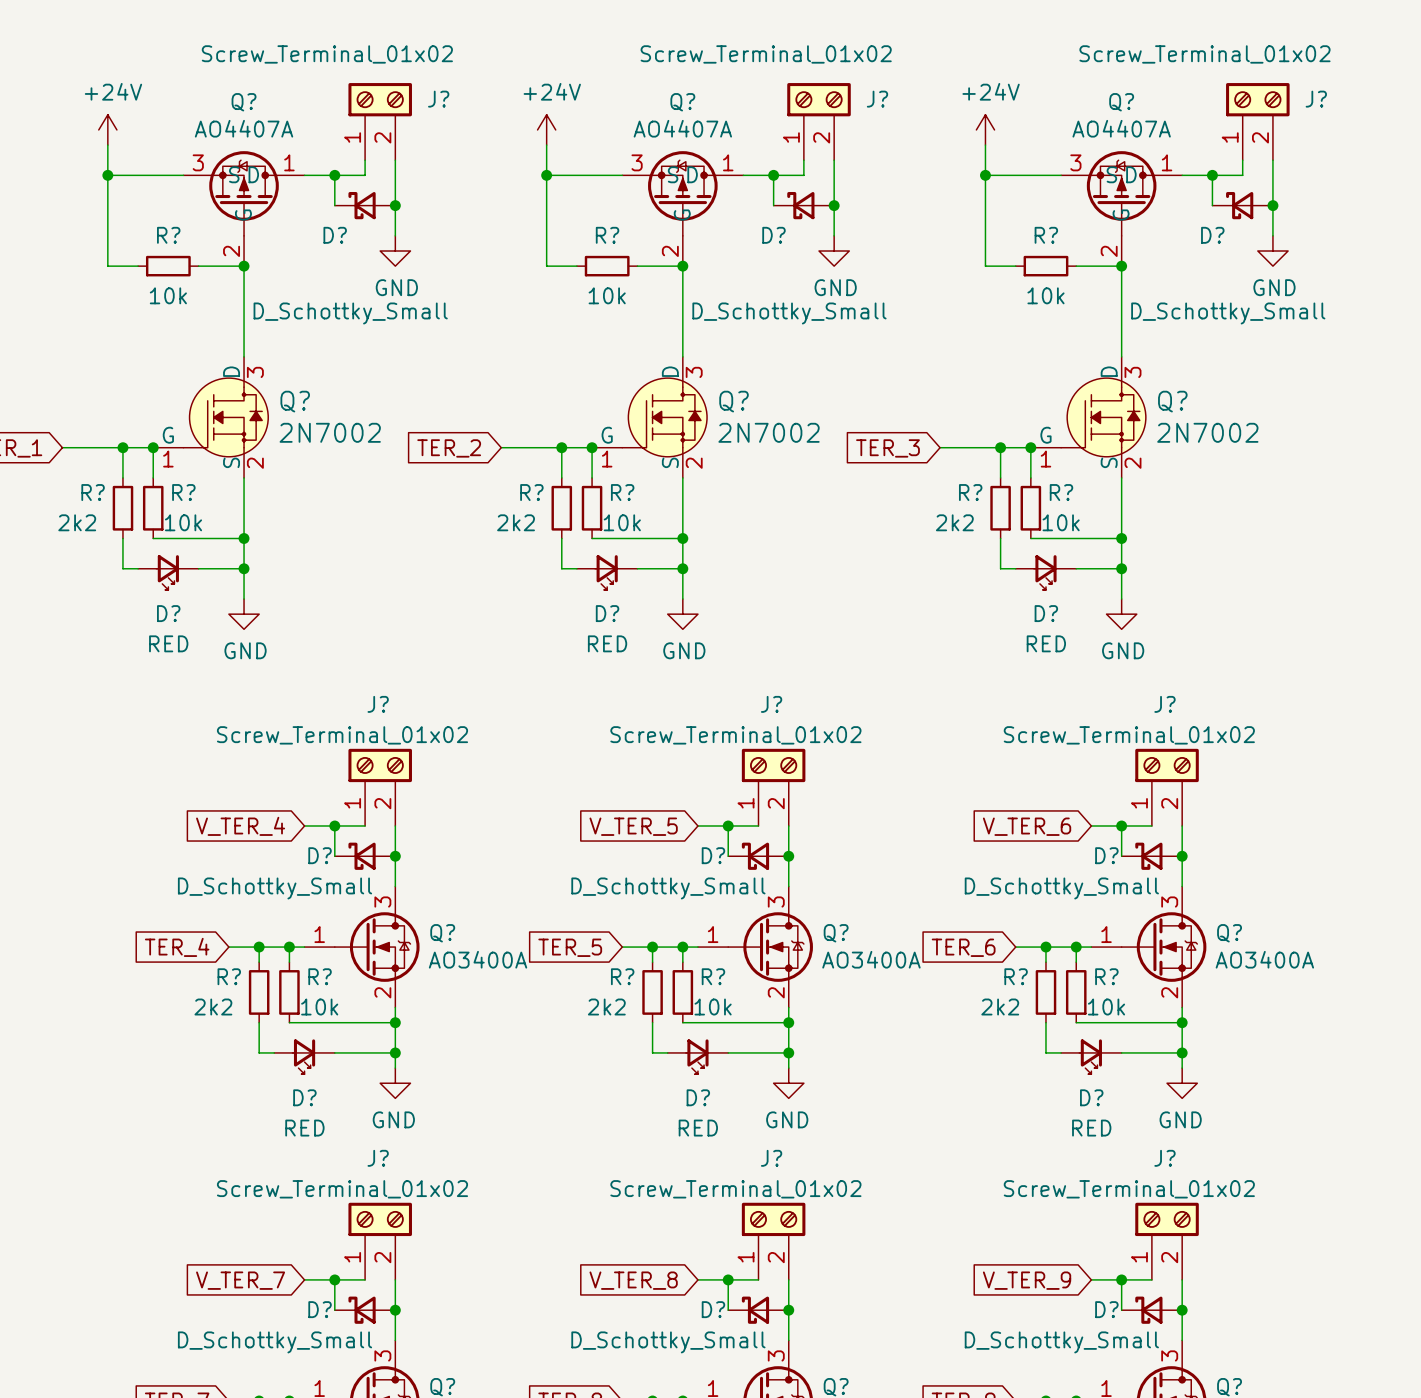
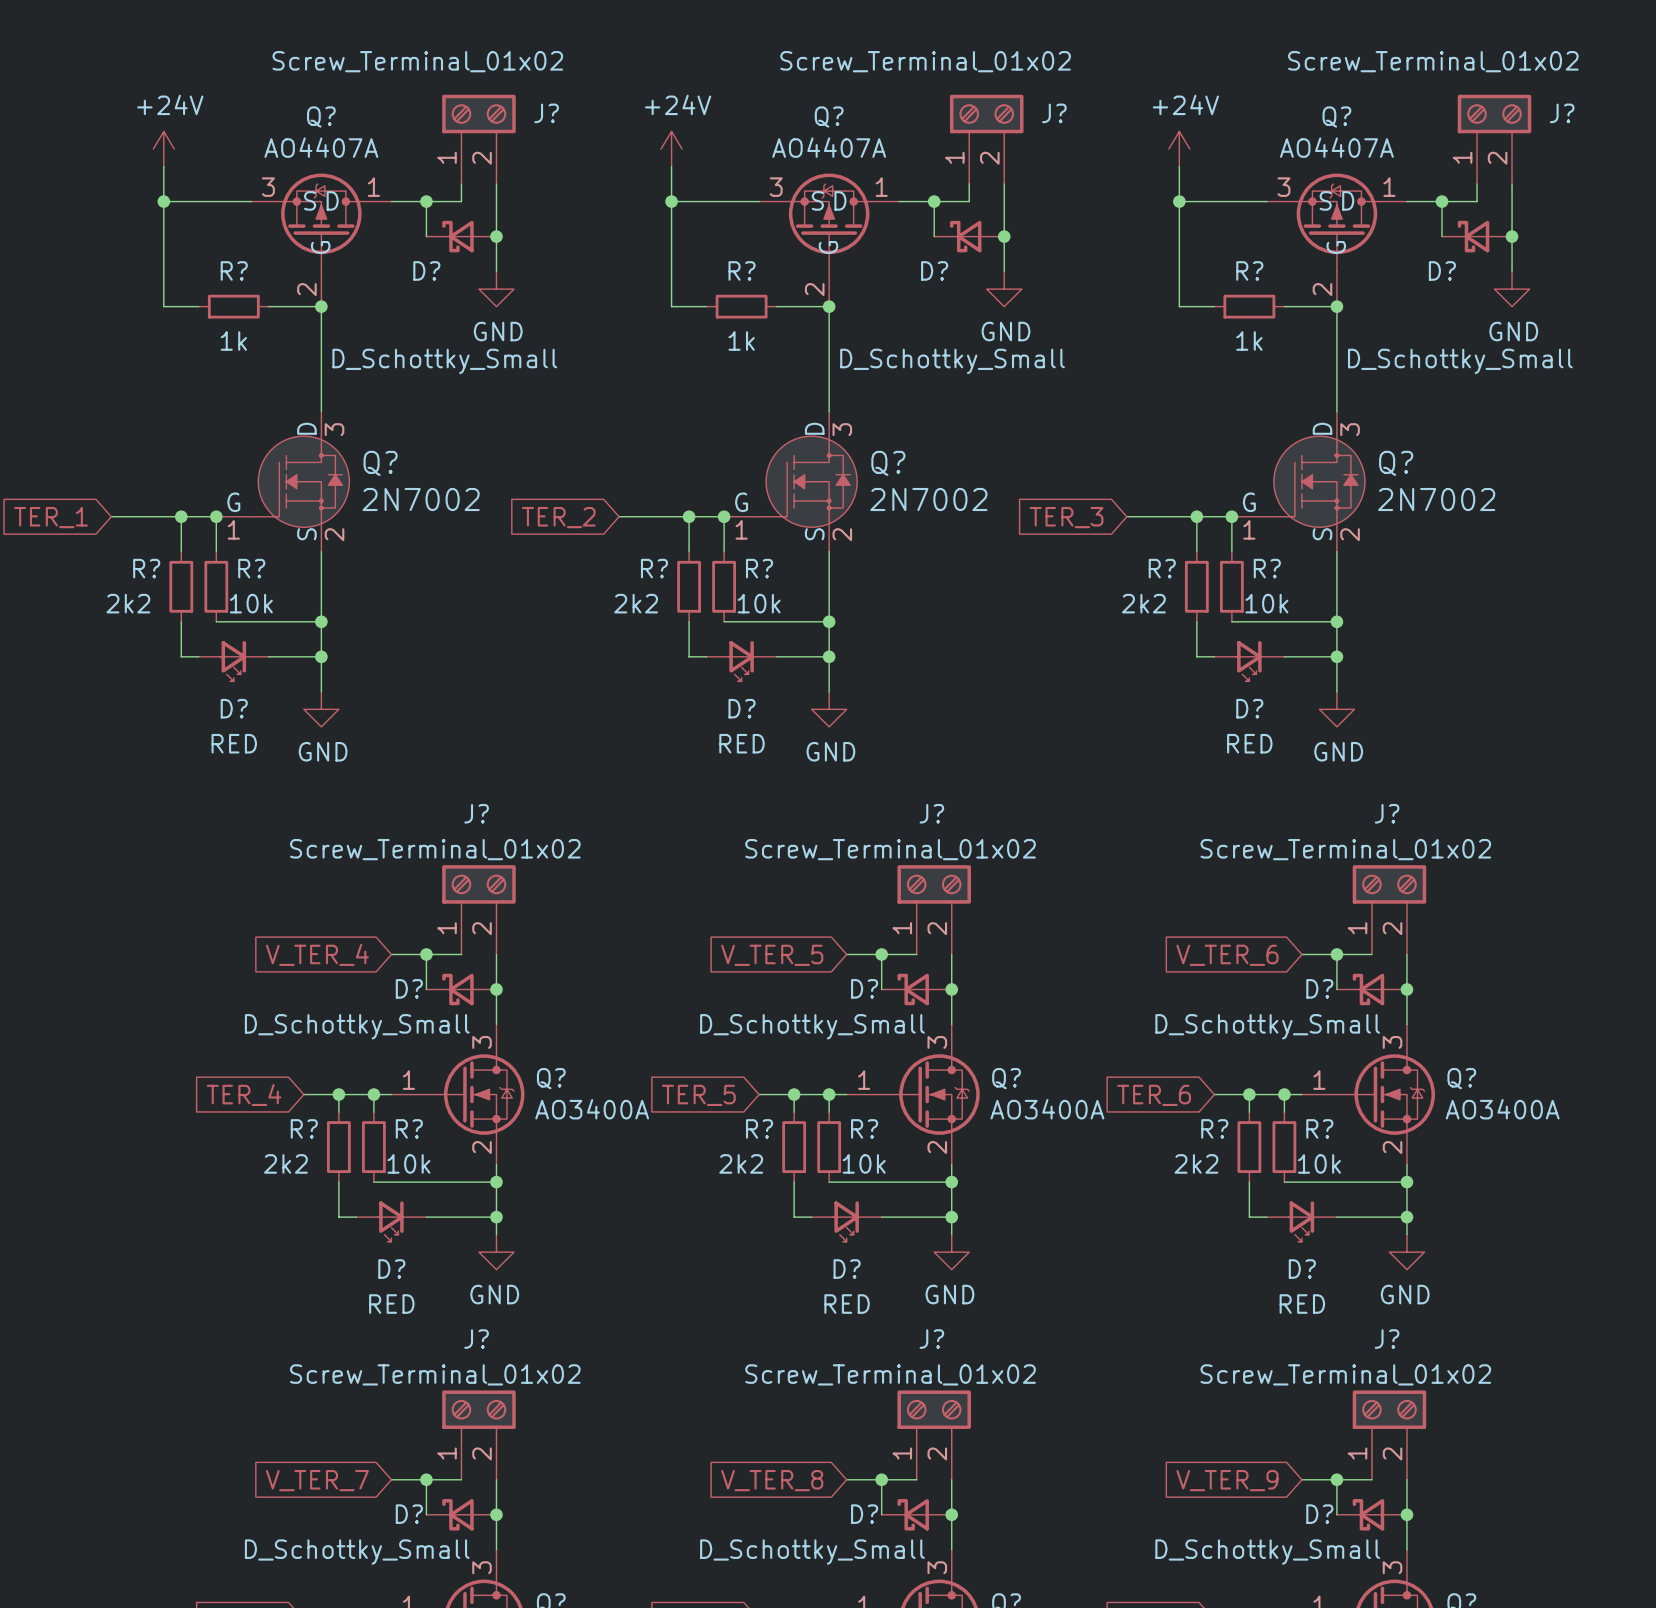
R? value: 10k (168, 295) -> 1k (233, 340)
R? value: 10k (607, 295) -> 1k (741, 340)
R? value: 10k (1045, 295) -> 1k (1249, 340)

